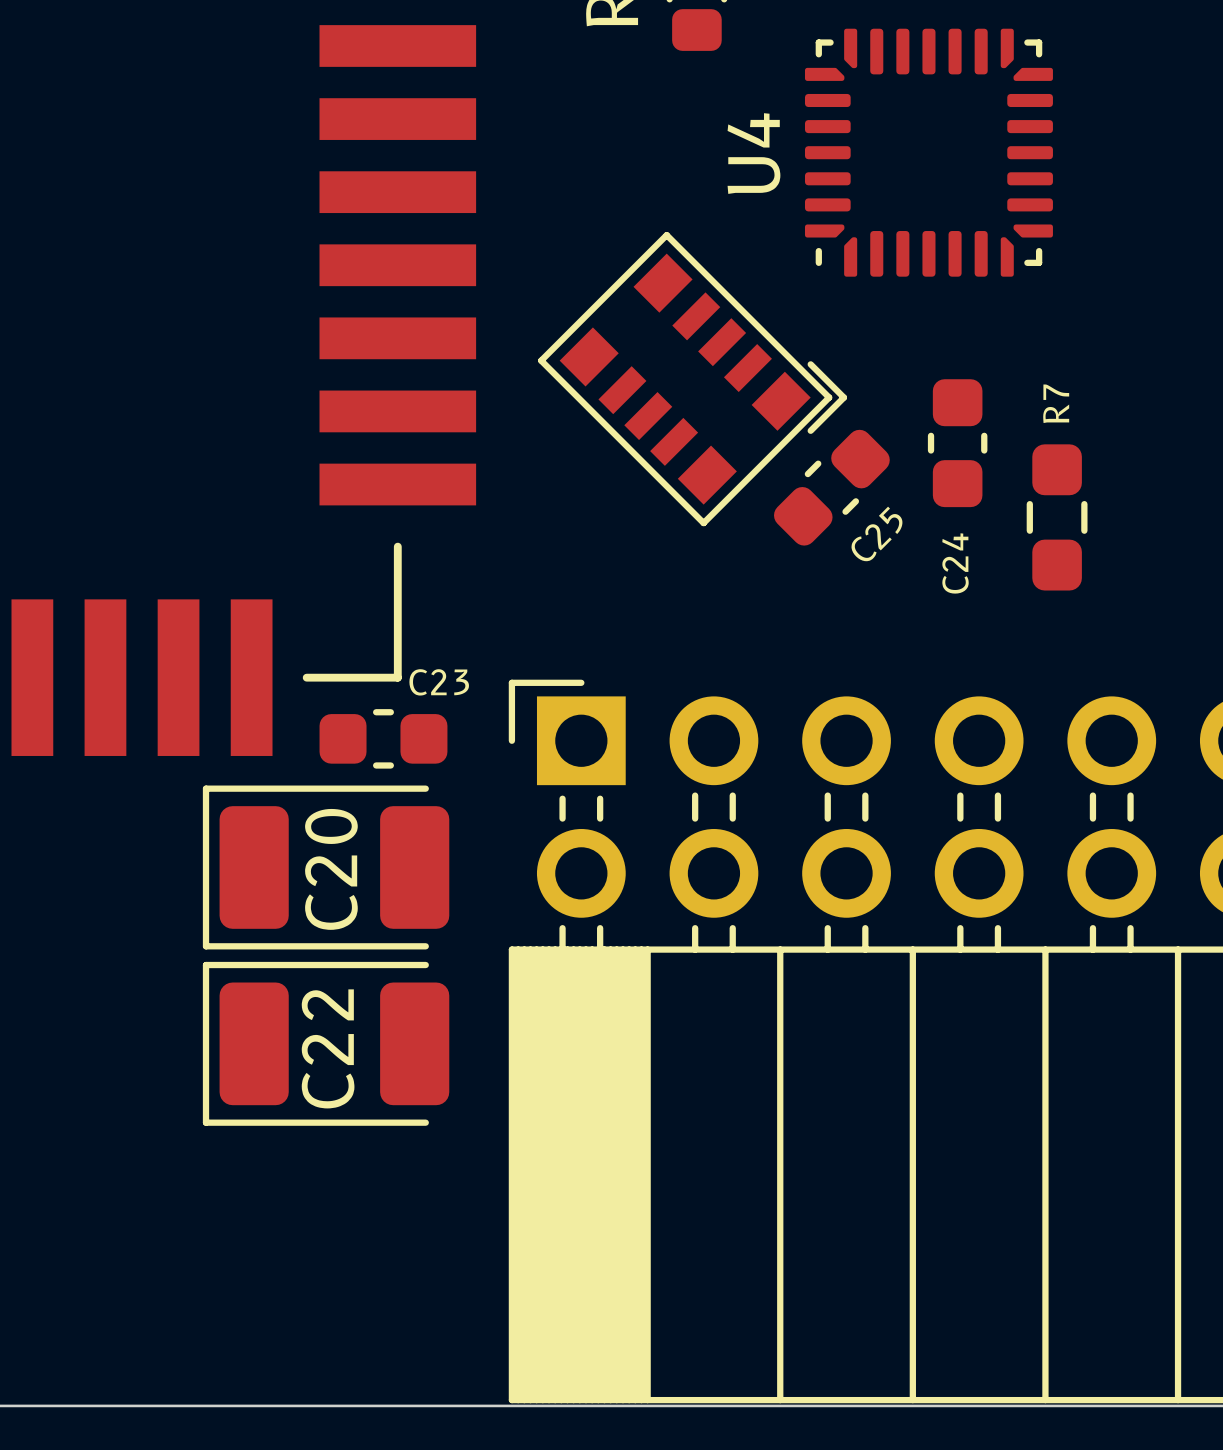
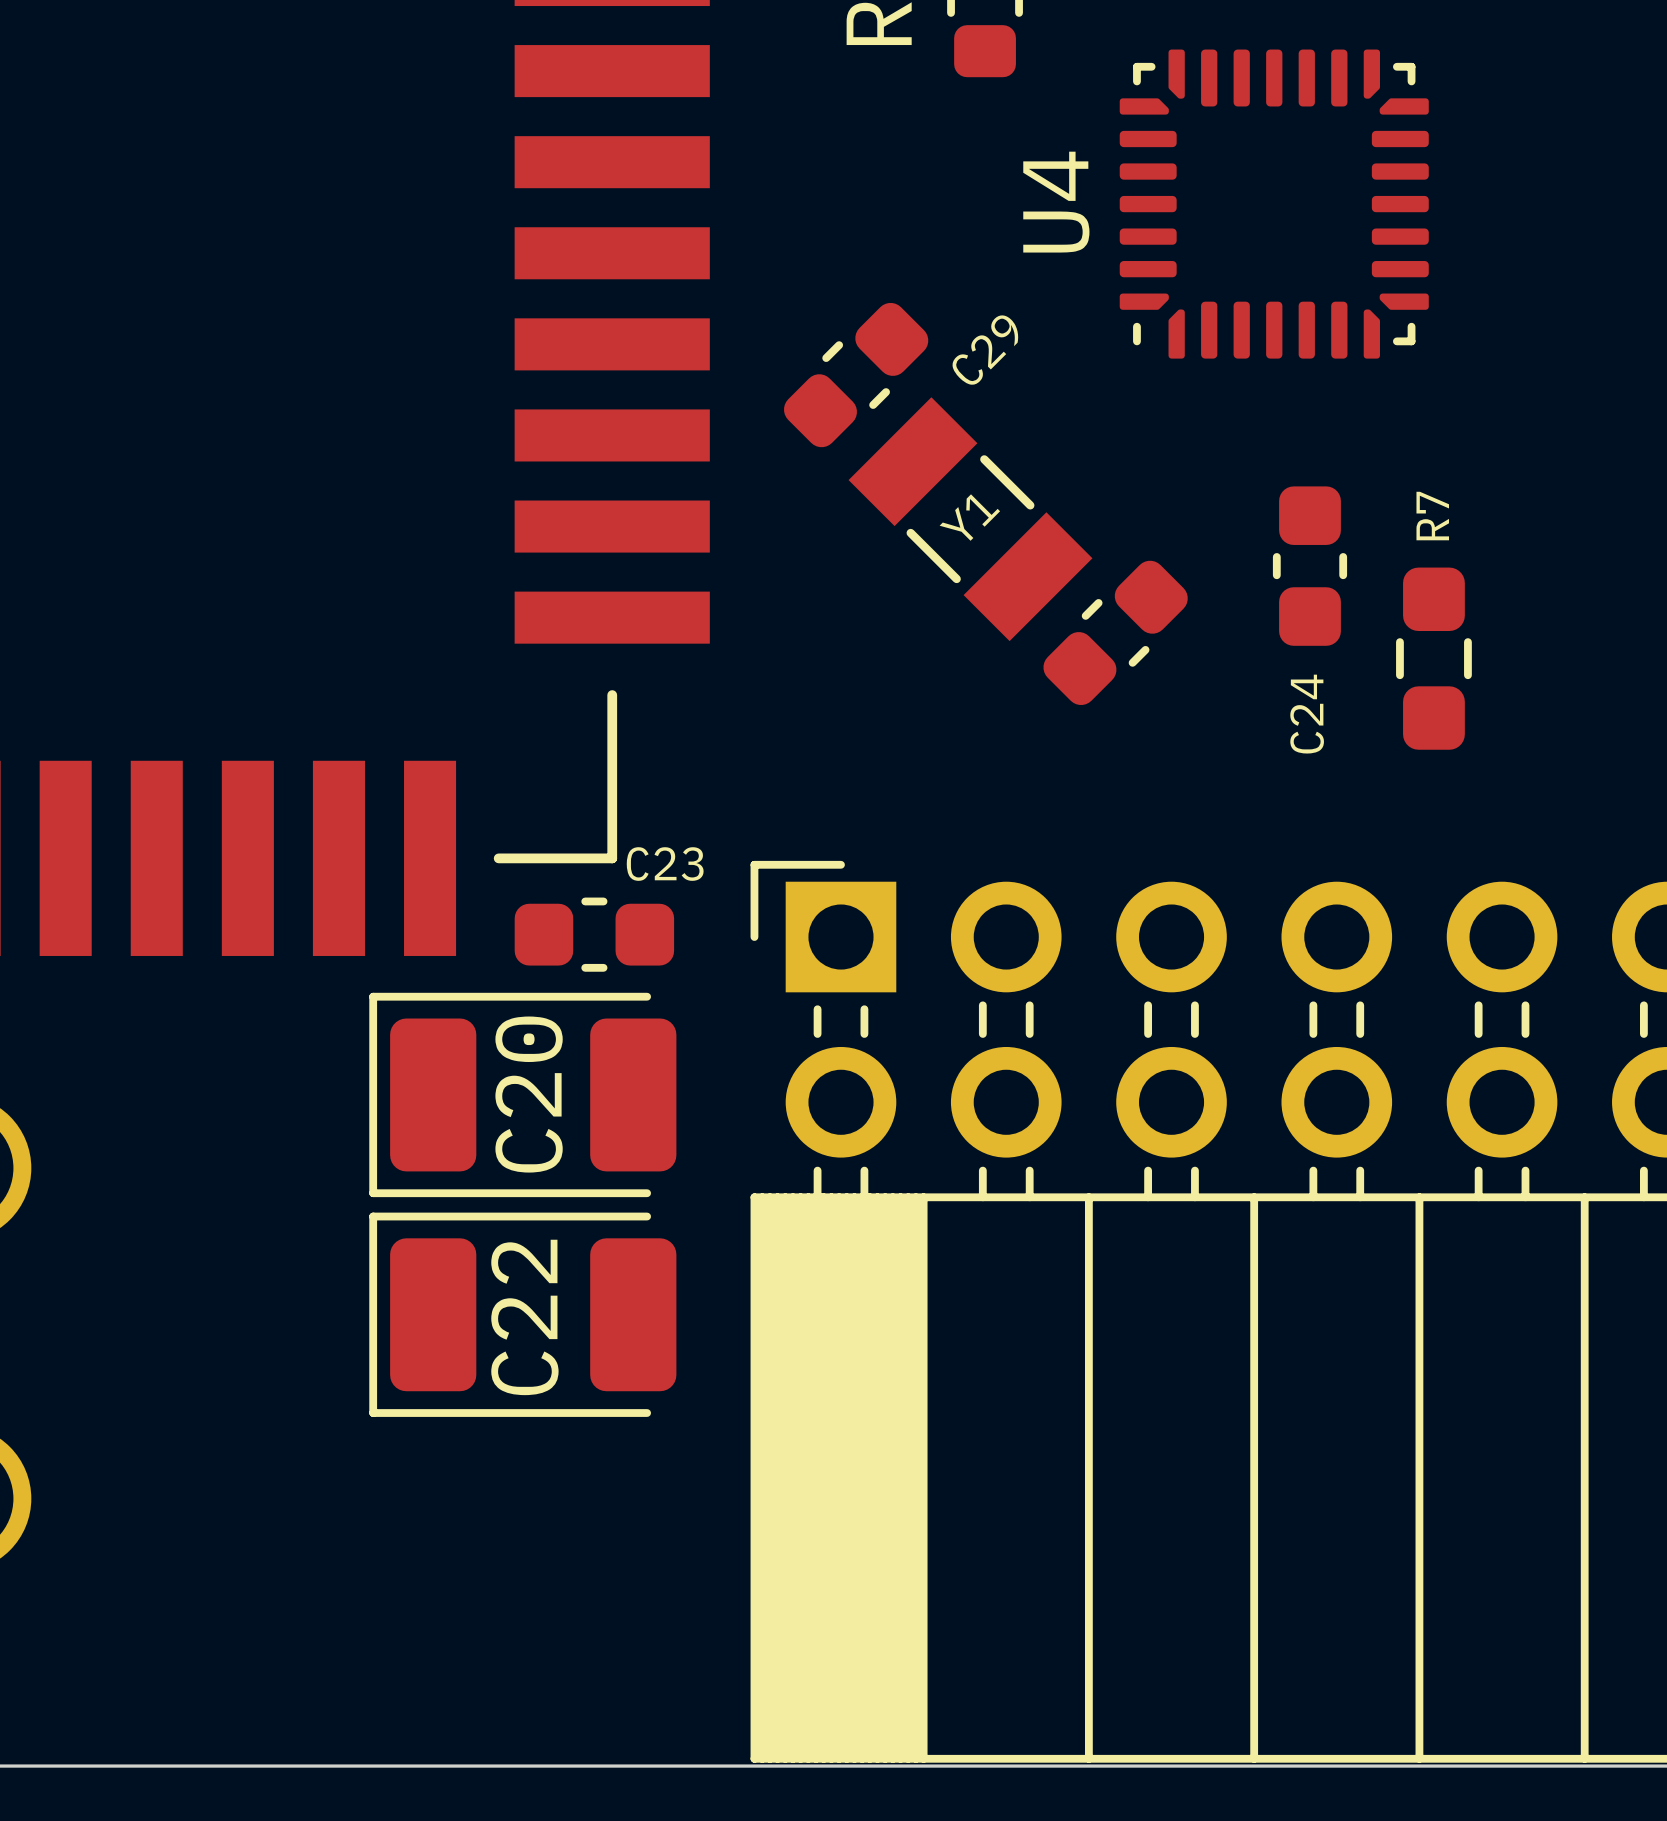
C29: none -> (856, 375)
part: (692, 379) -> none
Y1: none -> (970, 519)
C25 position: (831, 487) -> (1115, 632)
C25 name: C25 (876, 534) -> none

